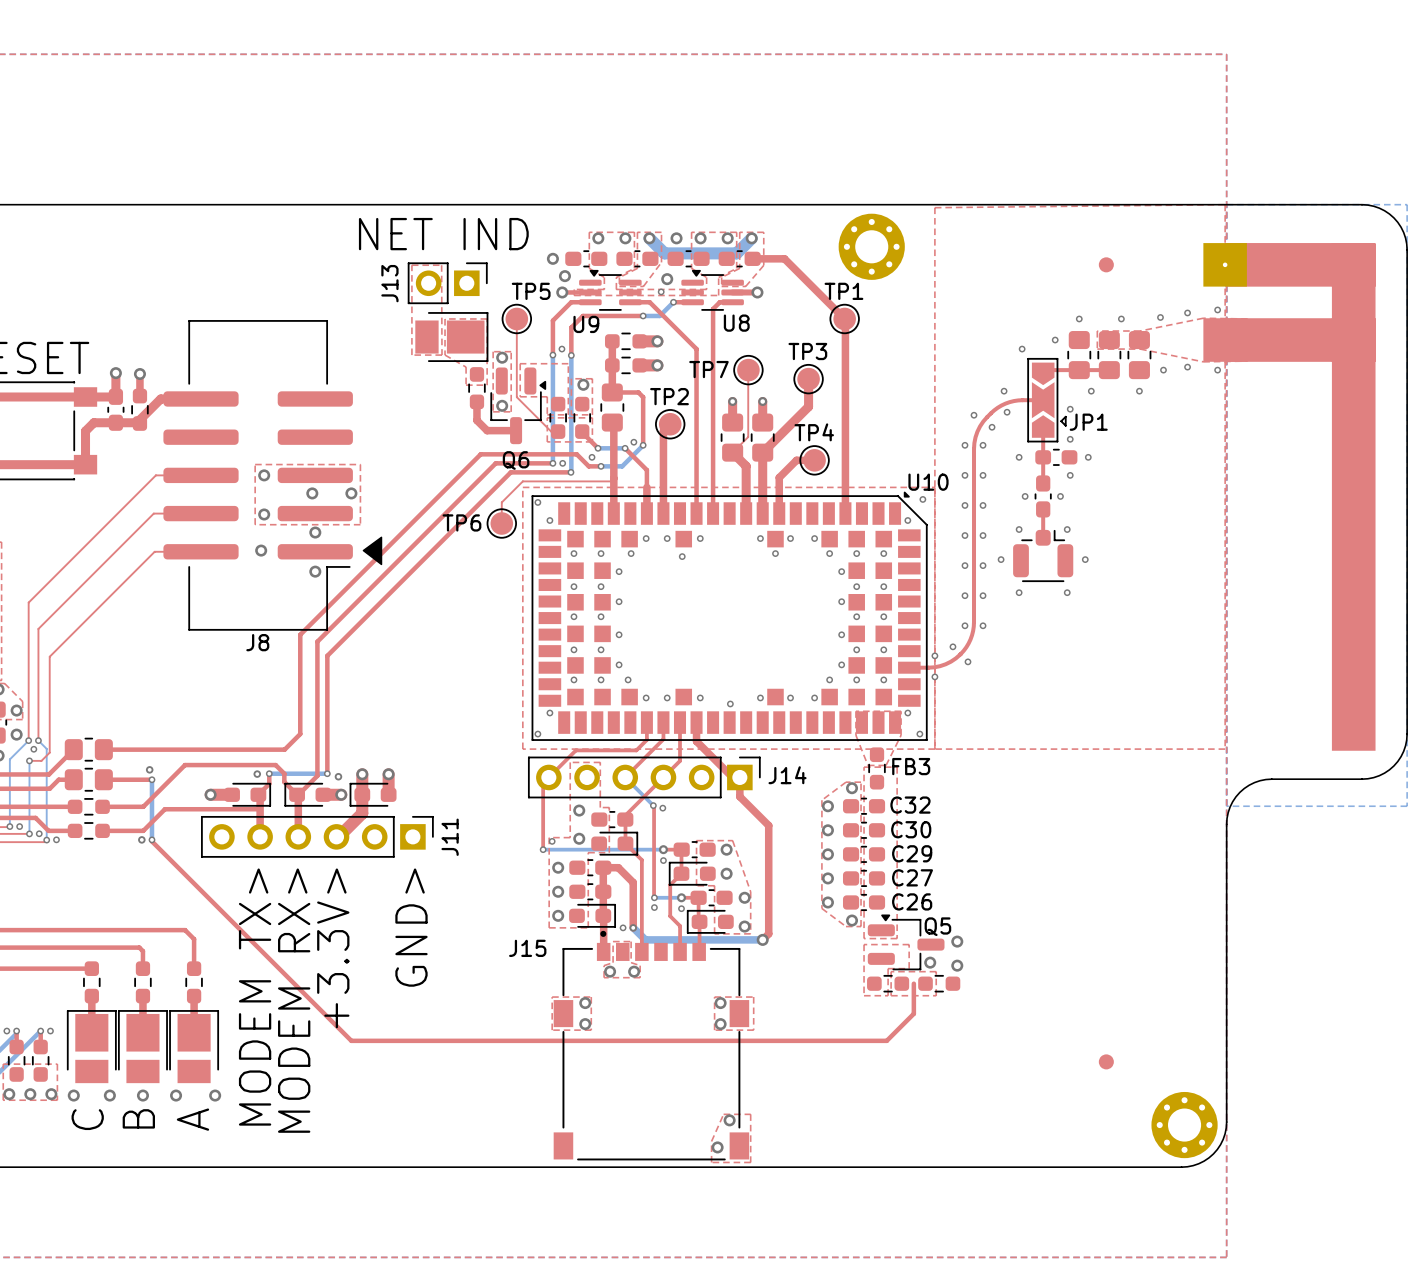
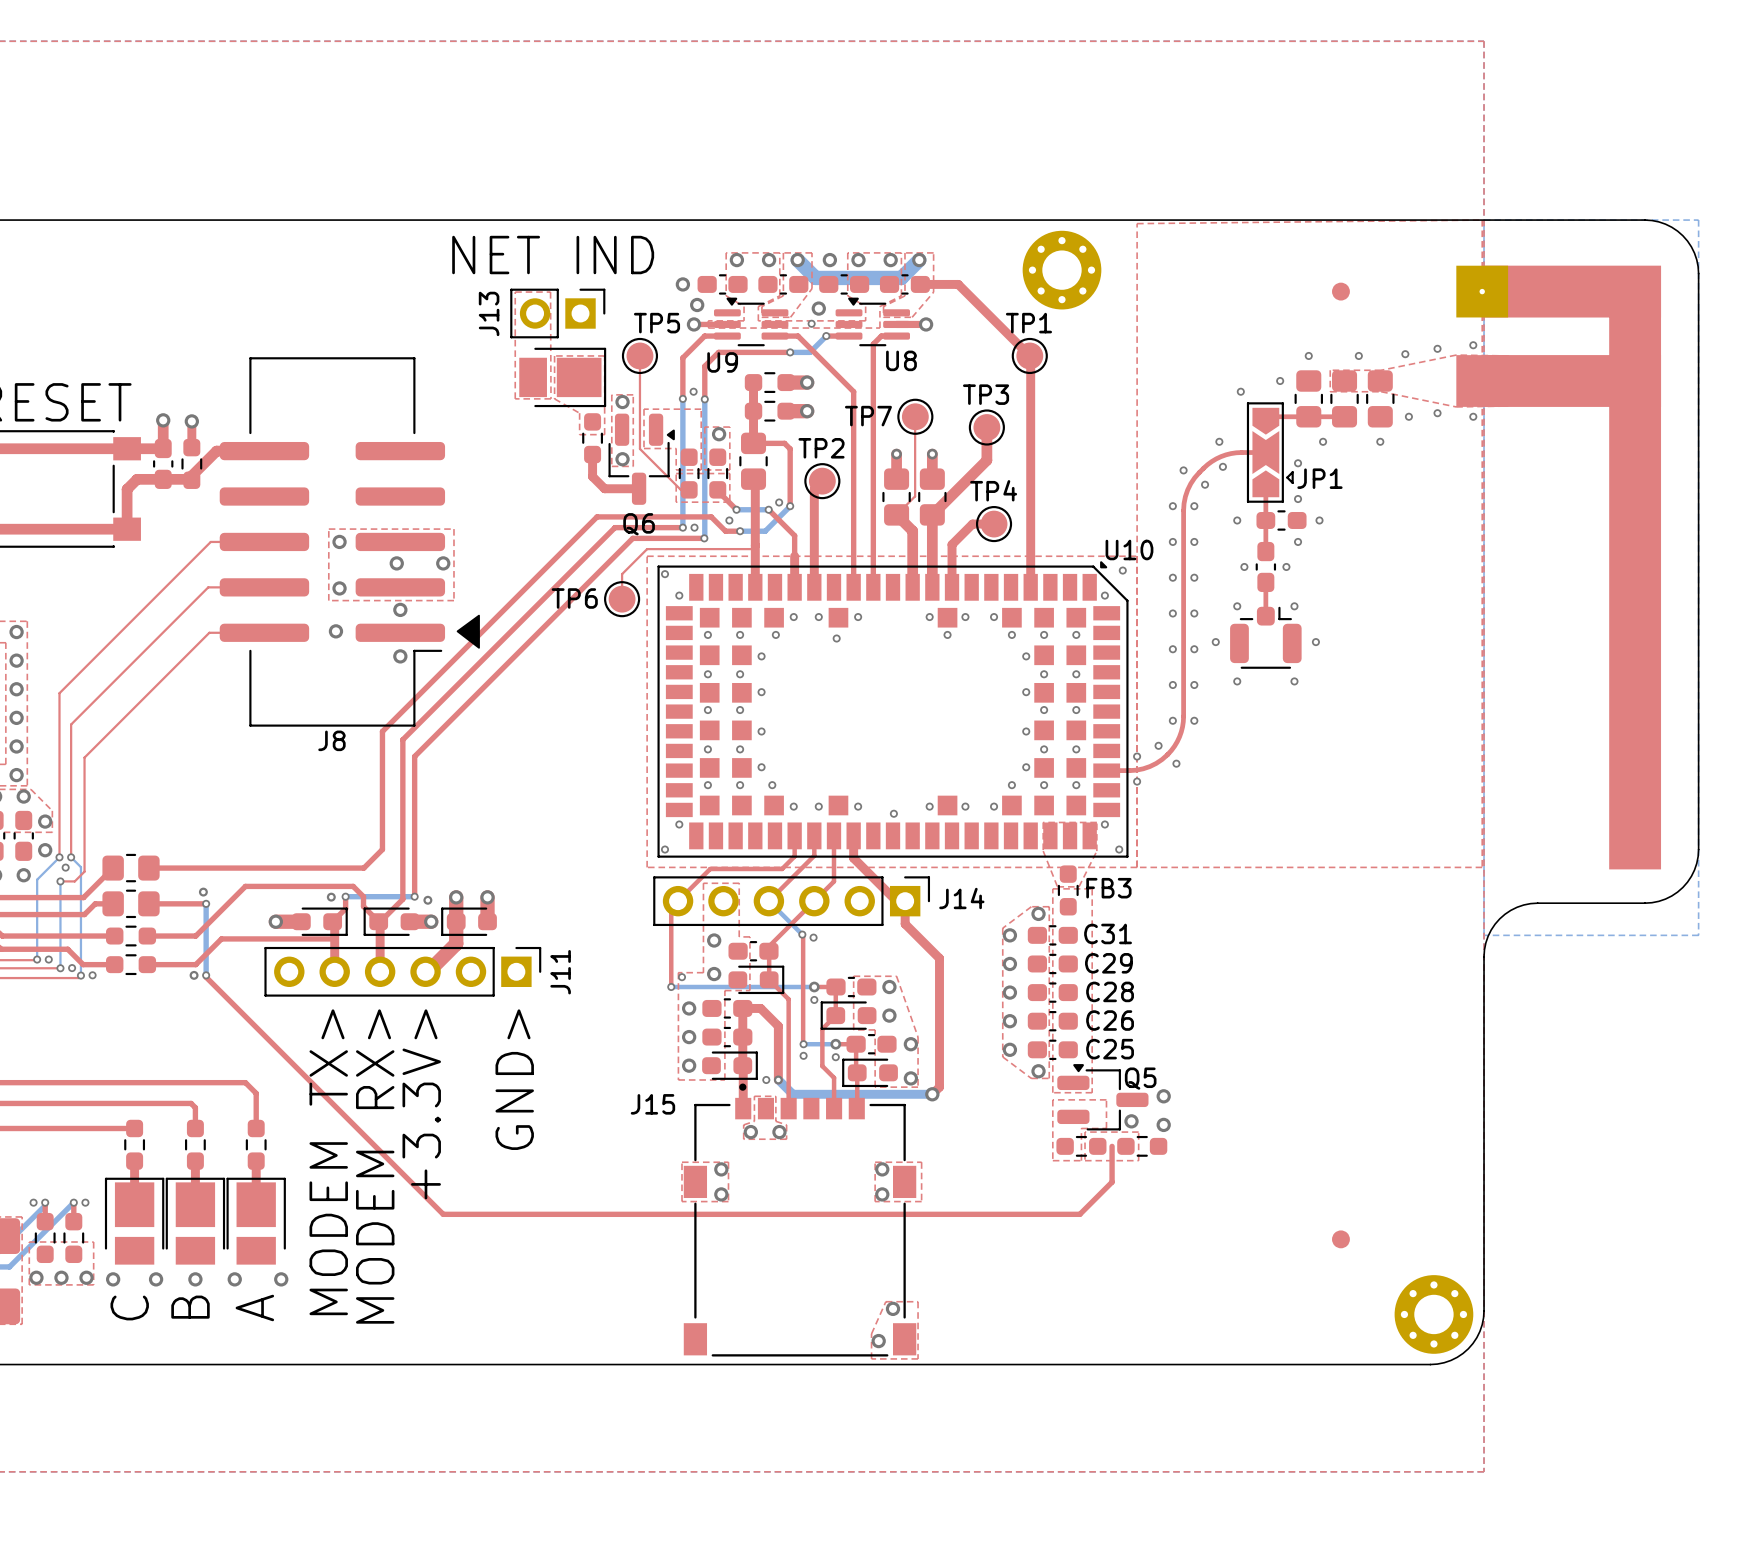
C32 name: C32 (910, 805) -> C31 (1108, 933)
C30 name: C30 (911, 829) -> C29 (1108, 963)
C29 name: C29 (912, 853) -> C28 (1110, 991)
C27 name: C27 (912, 877) -> C26 (1110, 1020)
C26 name: C26 (912, 901) -> C25 (1110, 1049)

